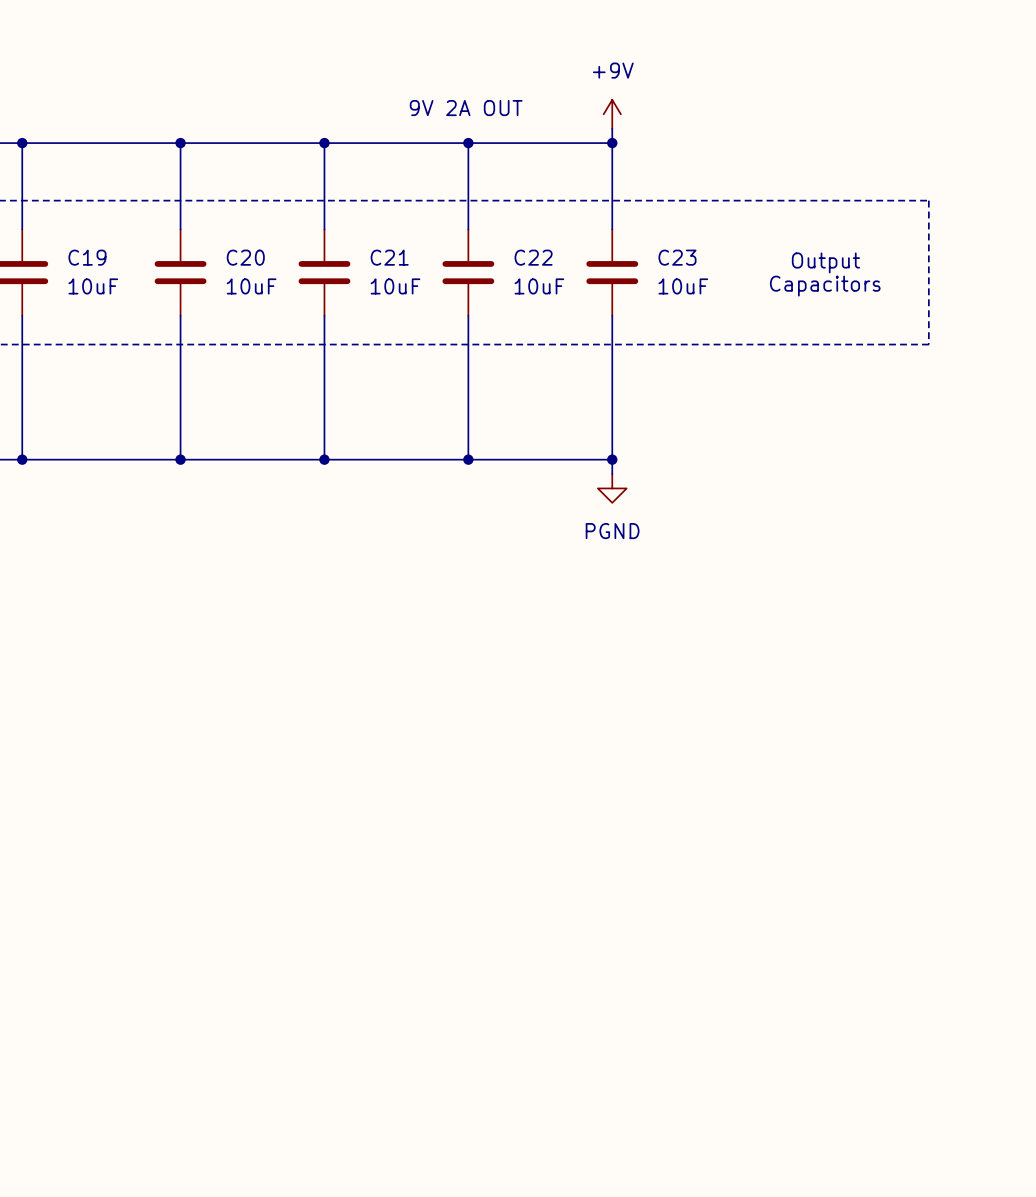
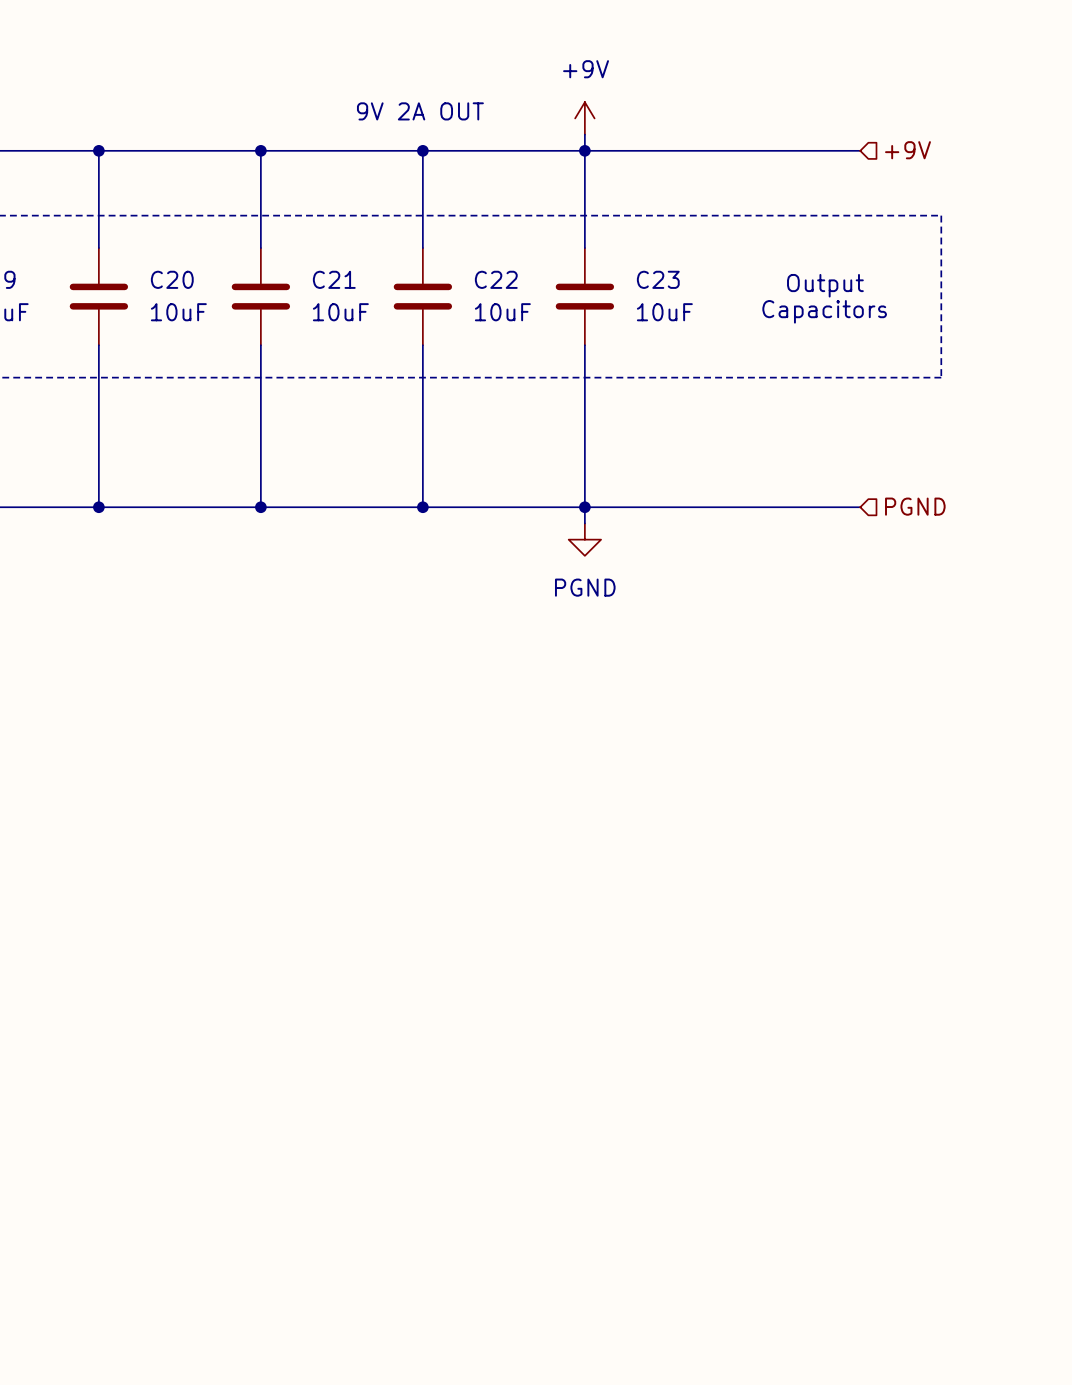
hierarchical label: none -> +9V (907, 150)
wire: none -> (584, 150) (860, 150)
wire: none -> (584, 507) (860, 507)
hierarchical label: none -> PGND (915, 506)

